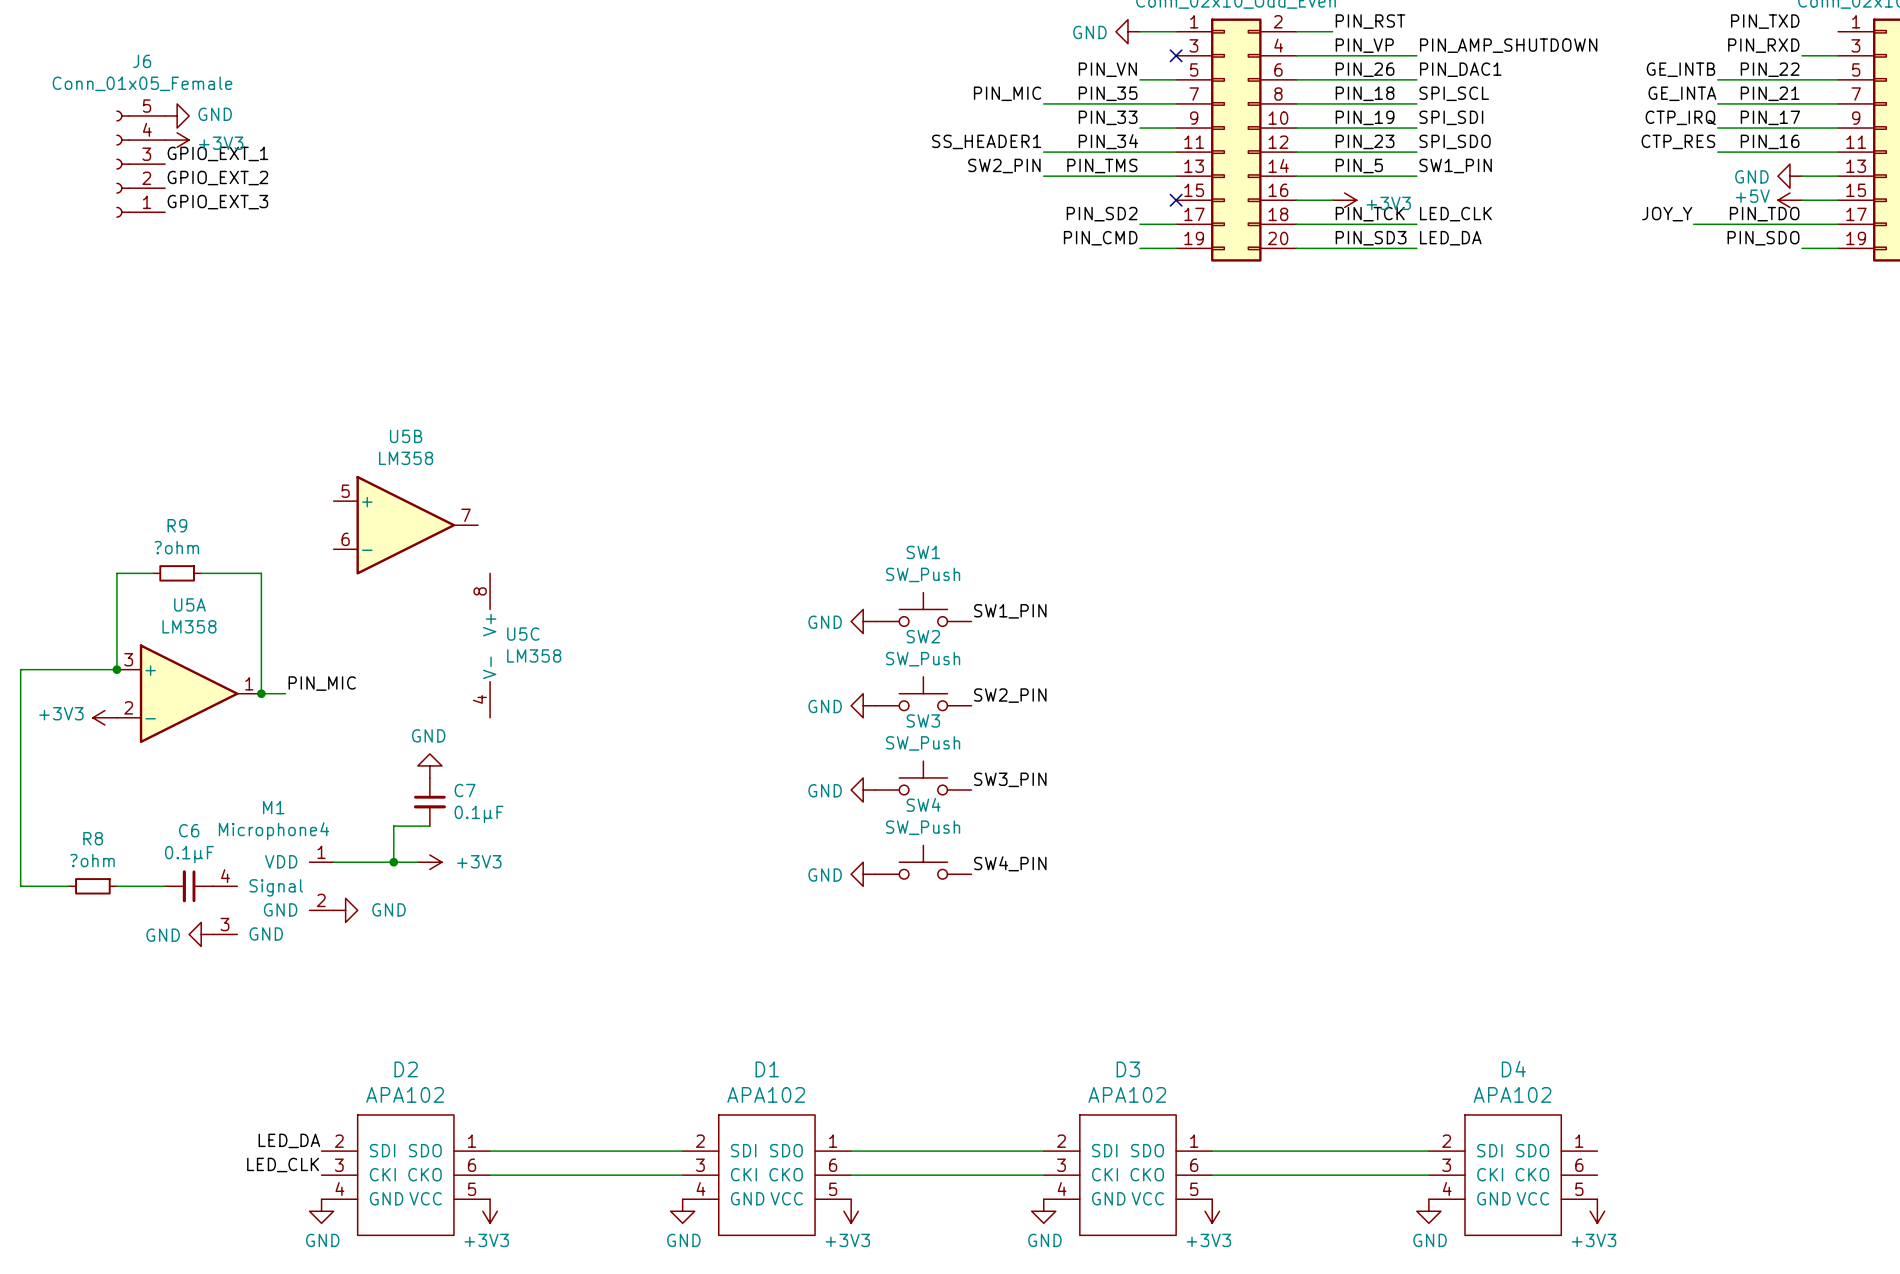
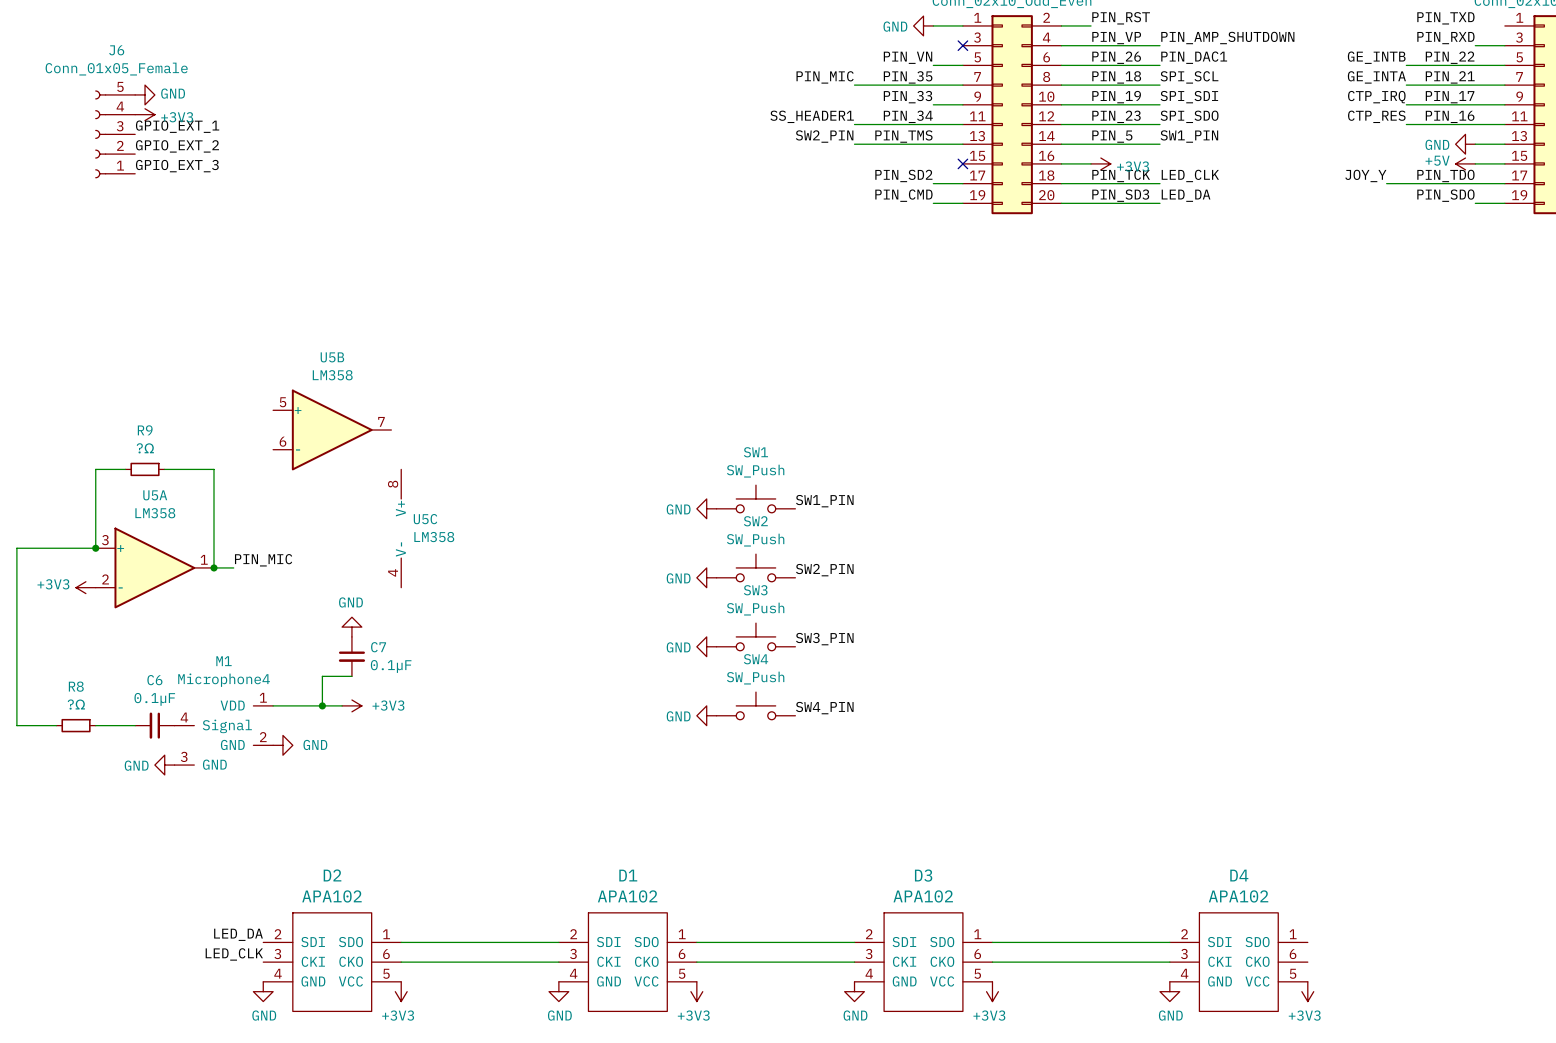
R9 value: ?ohm (176, 547) -> ?Ω (145, 448)
R8 value: ?ohm (92, 860) -> ?Ω (76, 704)

